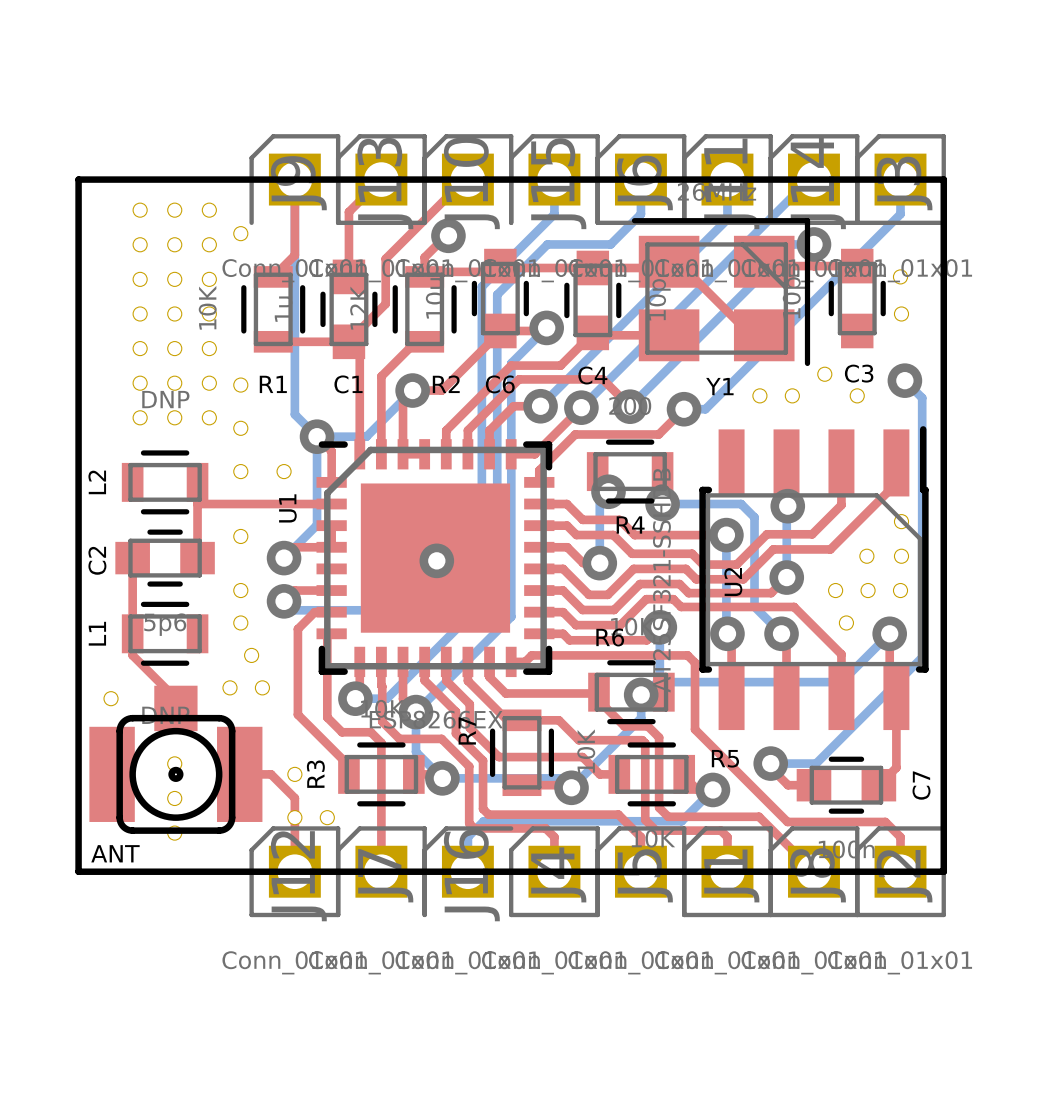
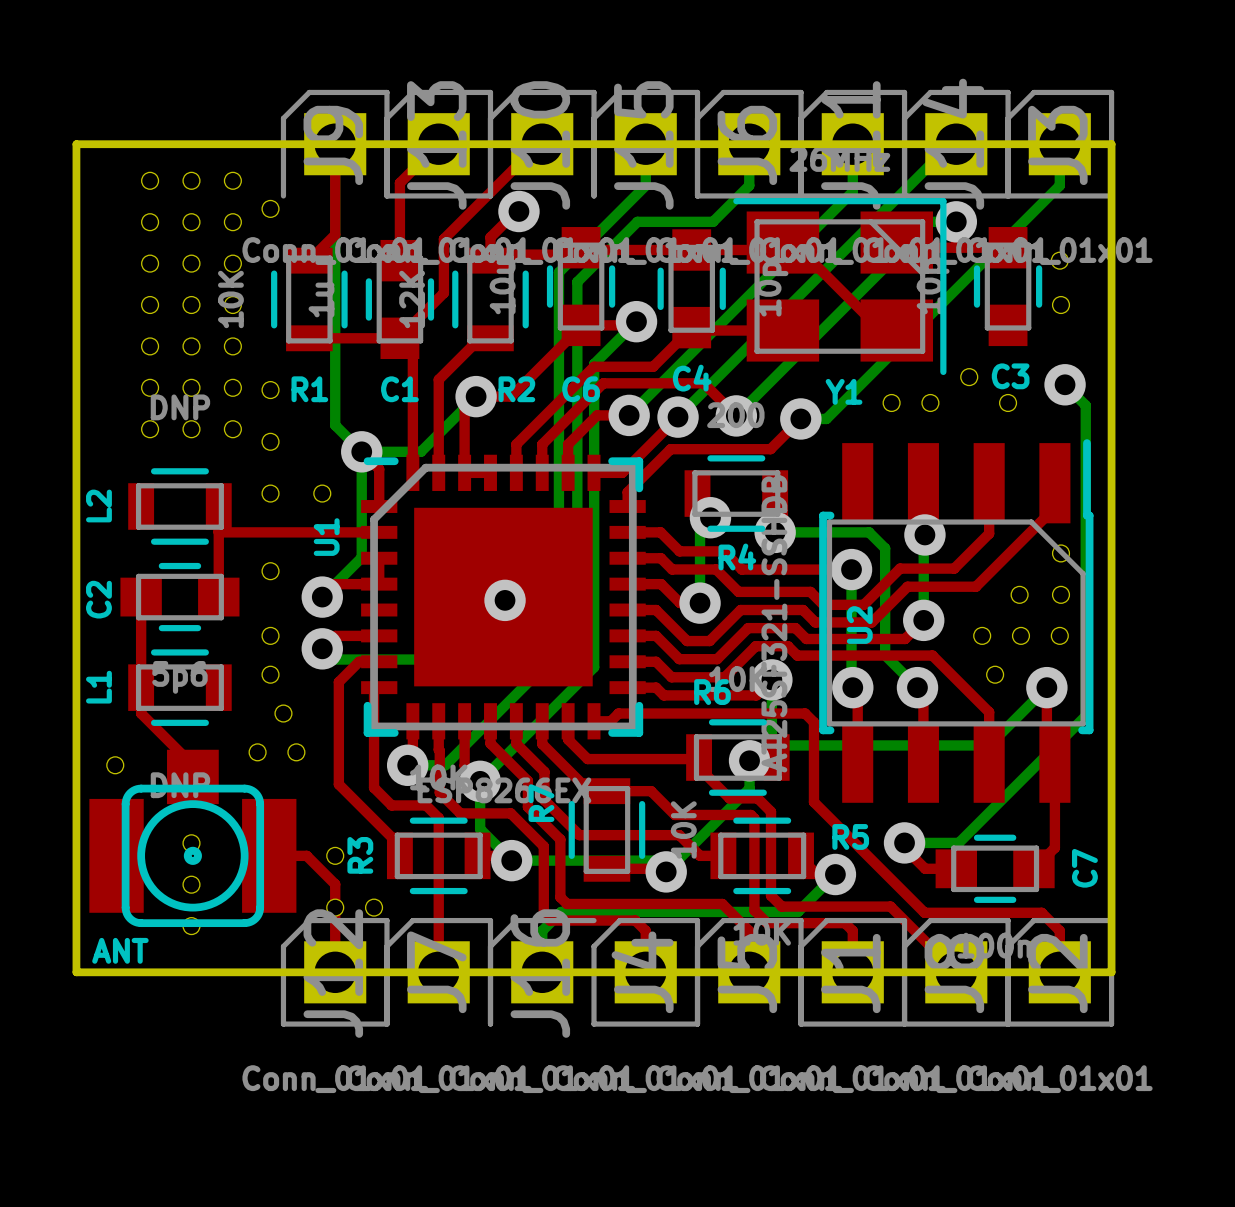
Y1 footprint: [631, 218, 811, 367] -> [733, 198, 947, 376]

